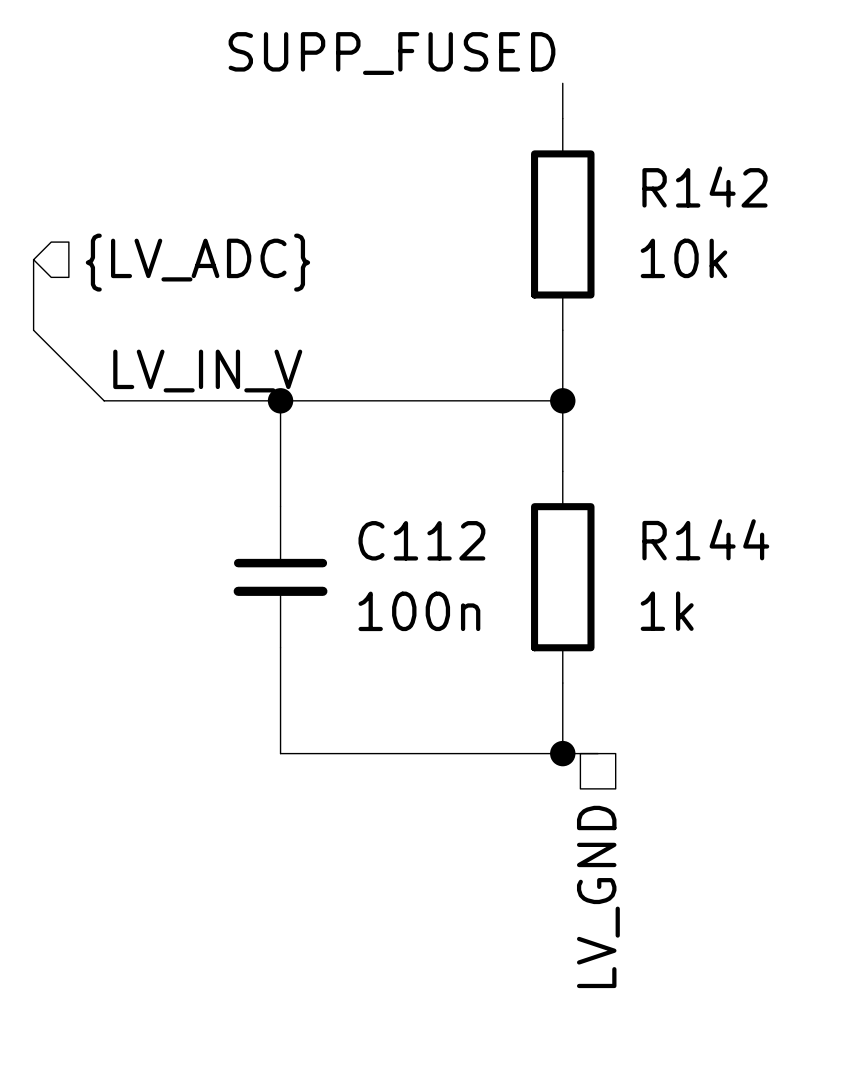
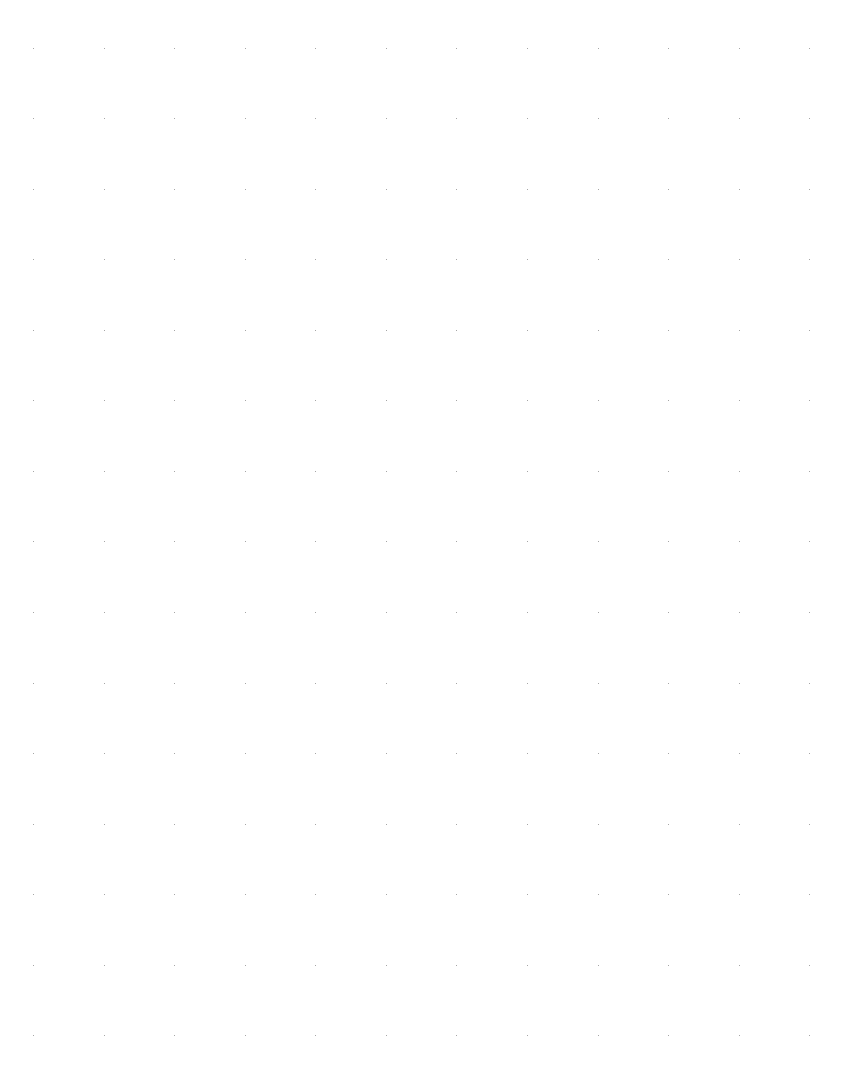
label: SUPP_FUSED (391, 53) -> none
wire: (562, 83) (562, 118) -> none
R142: 10k (562, 224) -> none
bus: (33, 259) (33, 330) -> none
hierarchical label: {LV_ADC} (197, 262) -> none
wire: (33, 330) (104, 400) (562, 400) -> none
wire: (562, 330) (562, 471) -> none
label: LV_IN_V (207, 371) -> none
wire: (280, 400) (280, 506) -> none
junction: (280, 400) -> none
junction: (562, 400) -> none
C112: 100n (280, 577) -> none
R144: 1k (562, 577) -> none
wire: (280, 647) (280, 753) (598, 753) -> none
wire: (562, 683) (562, 753) -> none
junction: (562, 753) -> none
hierarchical label: LV_GND (598, 896) -> none

